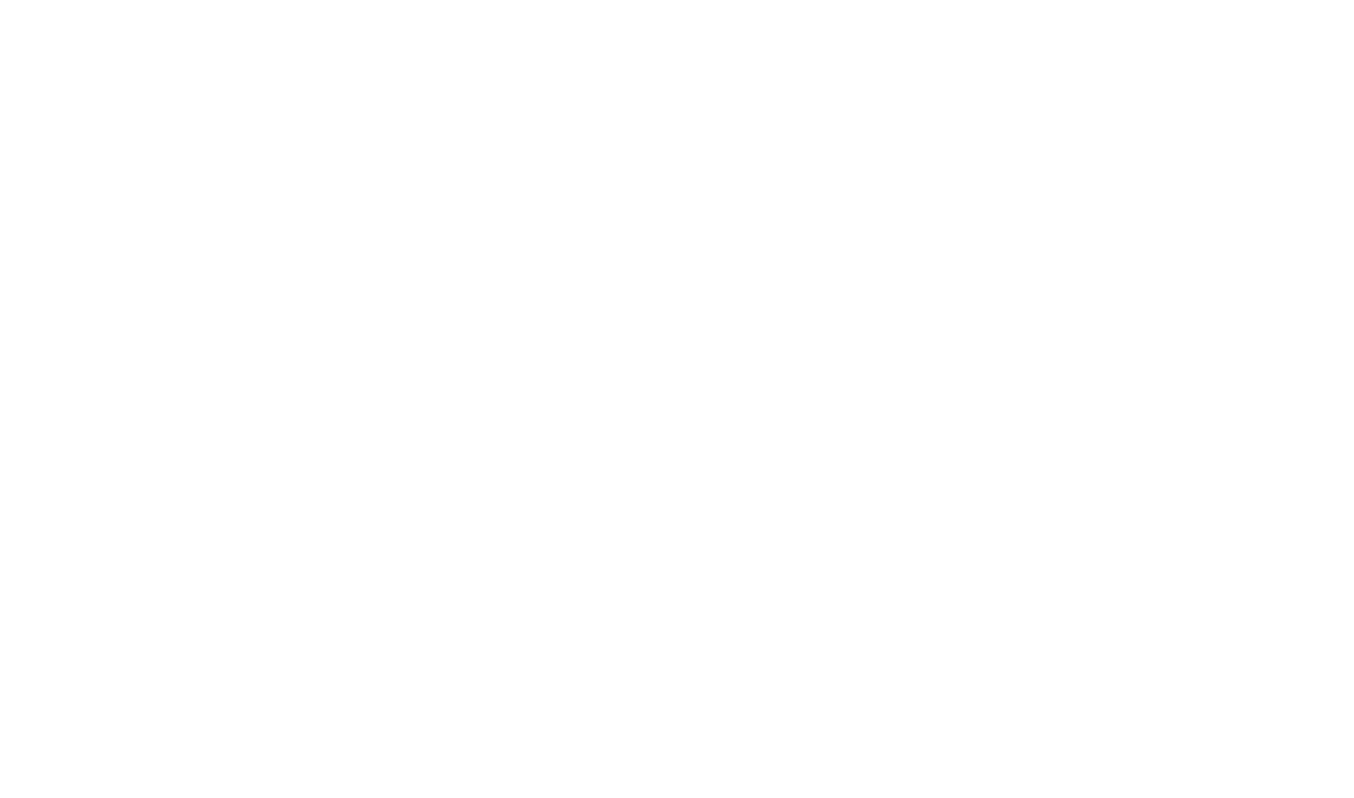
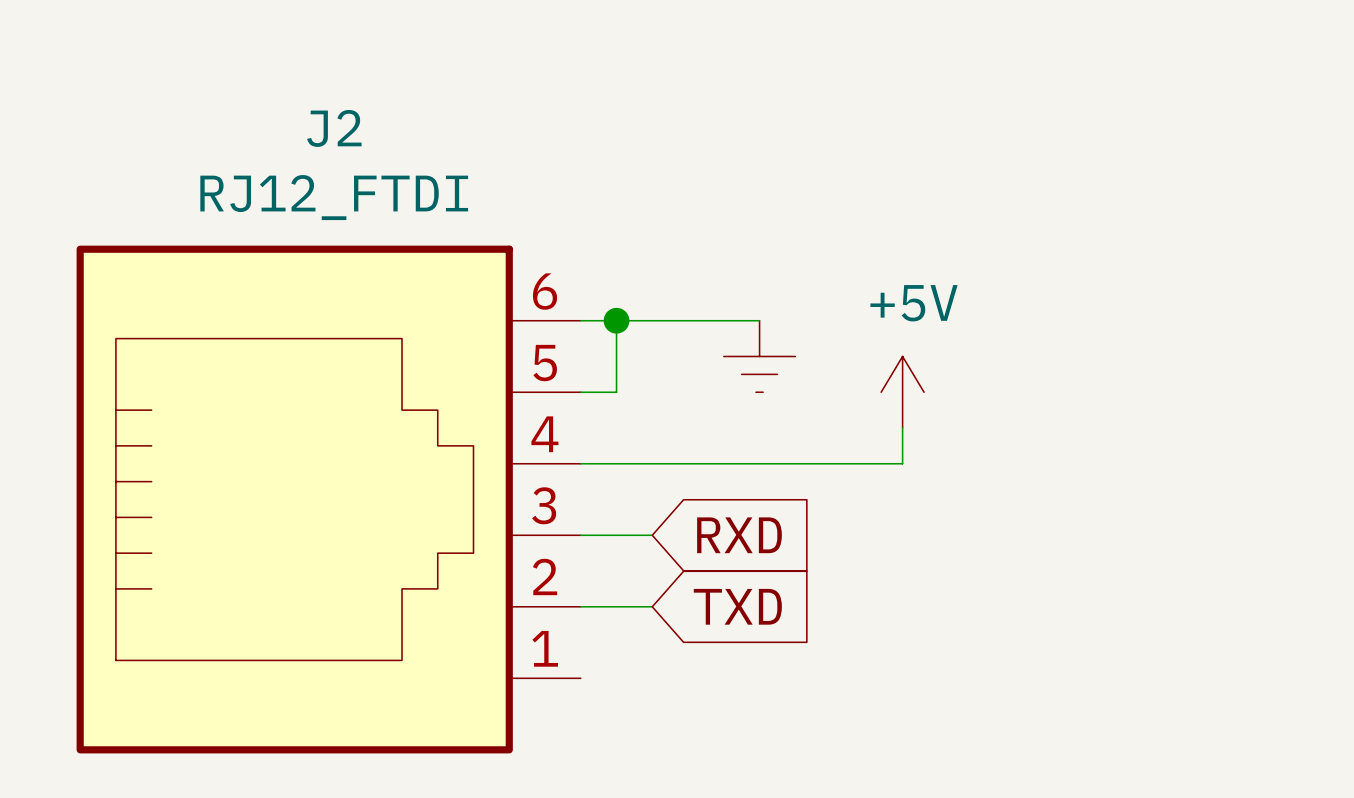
wire: none -> (580, 320) (759, 320)
wire: none -> (616, 320) (616, 392) (580, 392)
junction: none -> (616, 320)
power symbol: none -> (759, 356)
power symbol: none -> +5V (902, 392)
wire: none -> (902, 428) (902, 463) (580, 463)
J2: none -> RJ12_FTDI (328, 499)
wire: none -> (580, 535) (652, 535)
global label: none -> RXD (739, 535)
wire: none -> (580, 606) (652, 606)
global label: none -> TXD (737, 606)

